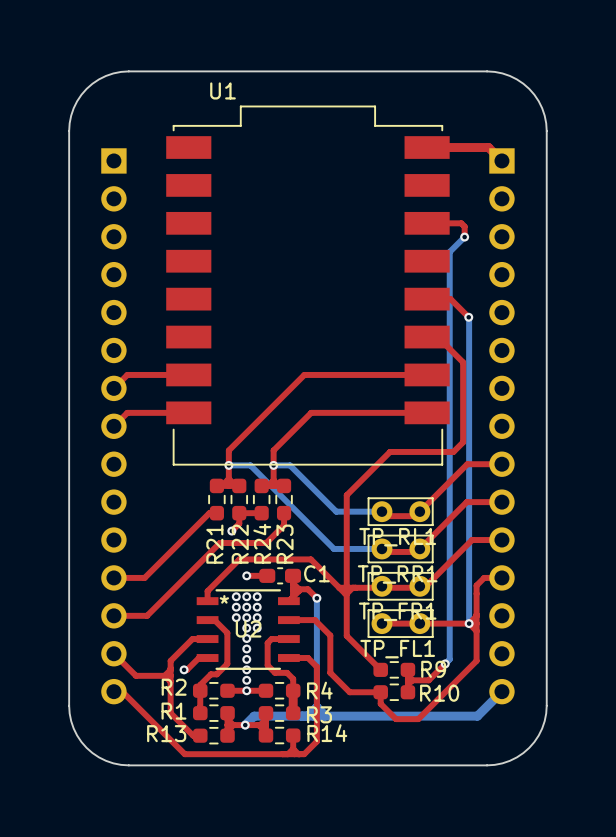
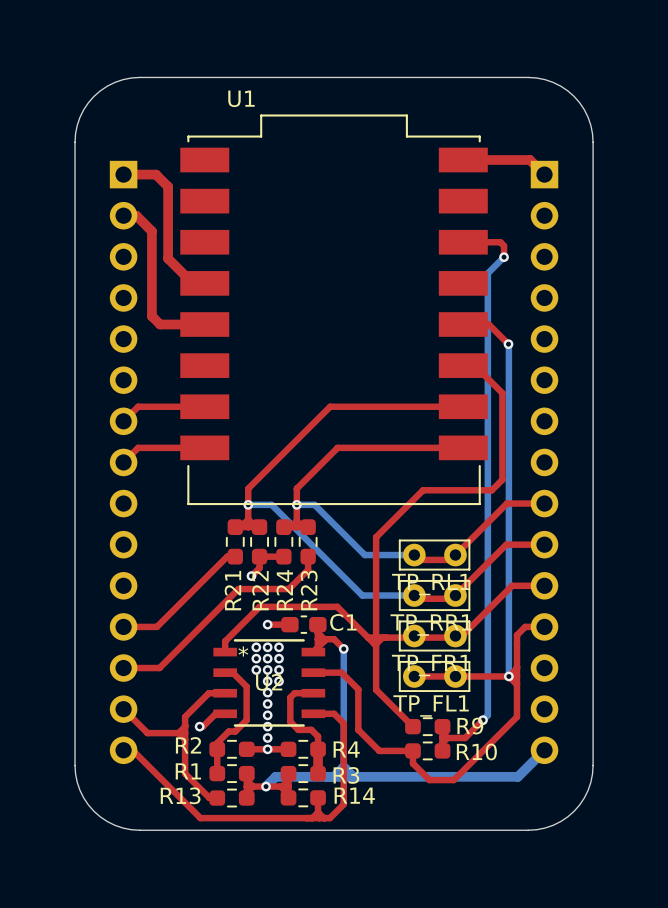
top track: none -> (123, 174) (155, 174) (168, 186) (168, 258) (192, 283) (204, 283)
top track: none -> (123, 215) (136, 215) (151, 231) (151, 316) (160, 324) (204, 324)

